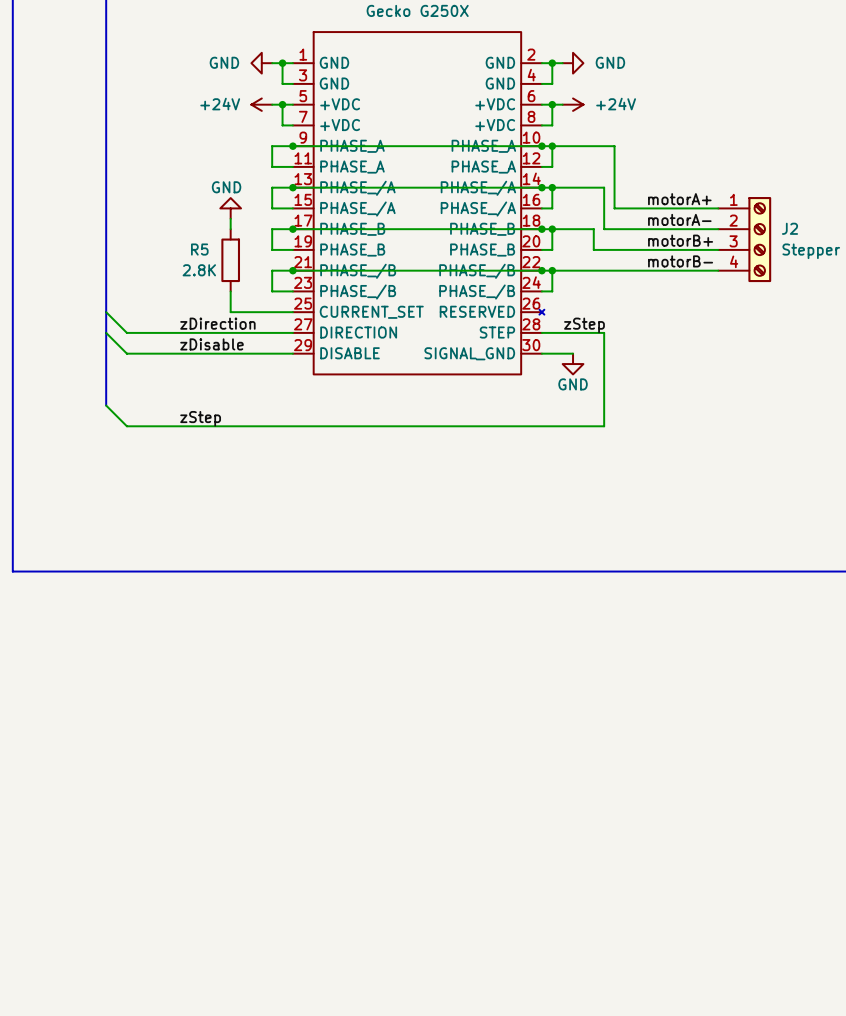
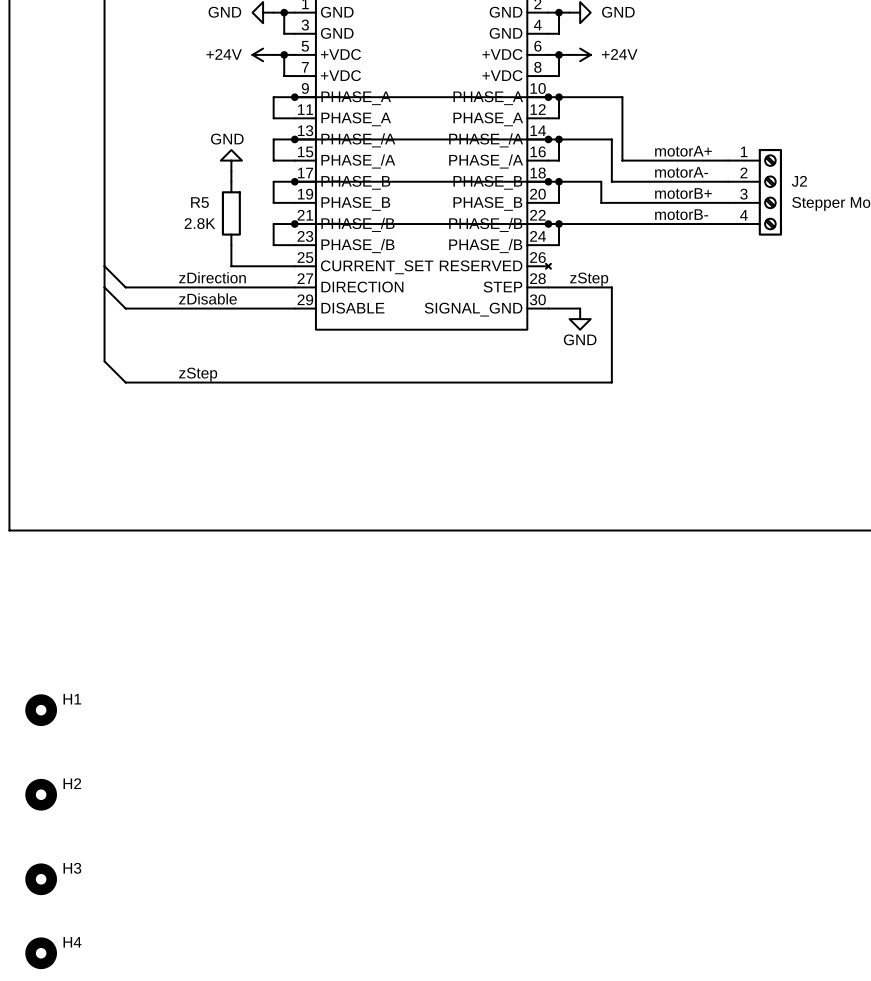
H1: none -> (41, 710)
H2: none -> (41, 794)
H3: none -> (41, 879)
H4: none -> (41, 953)

